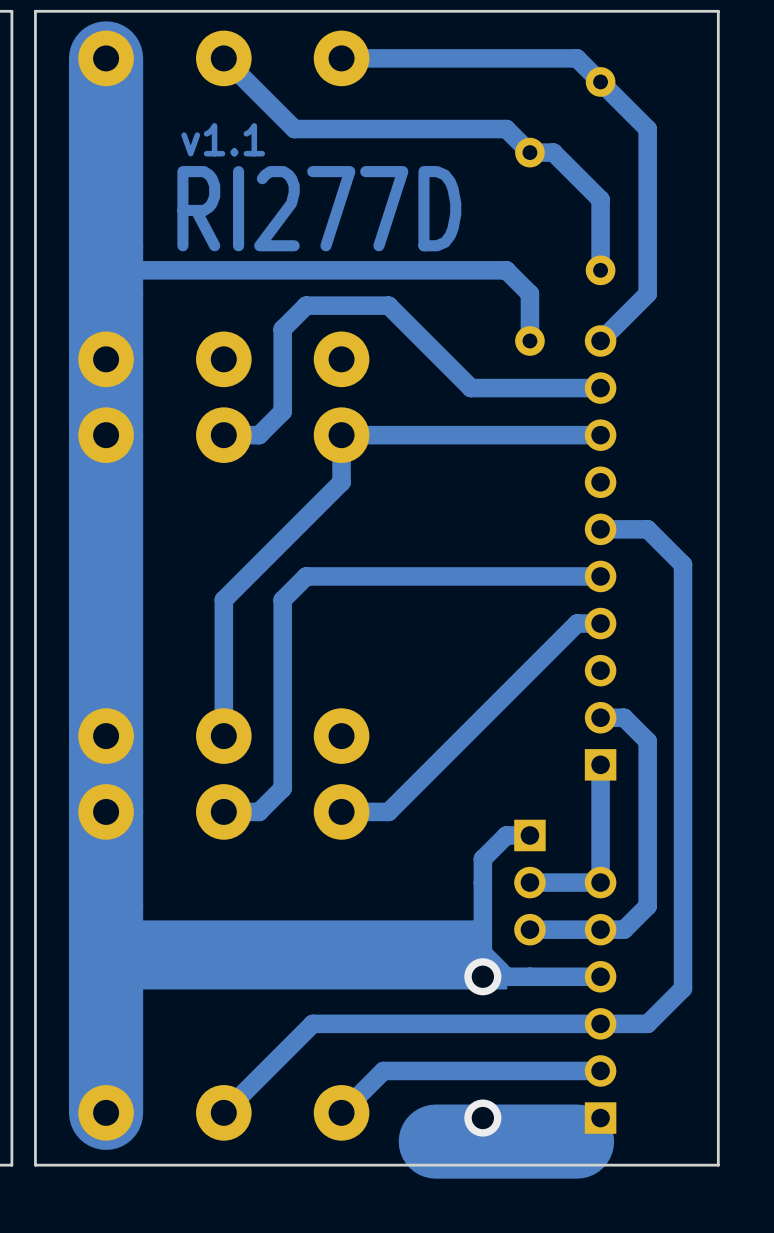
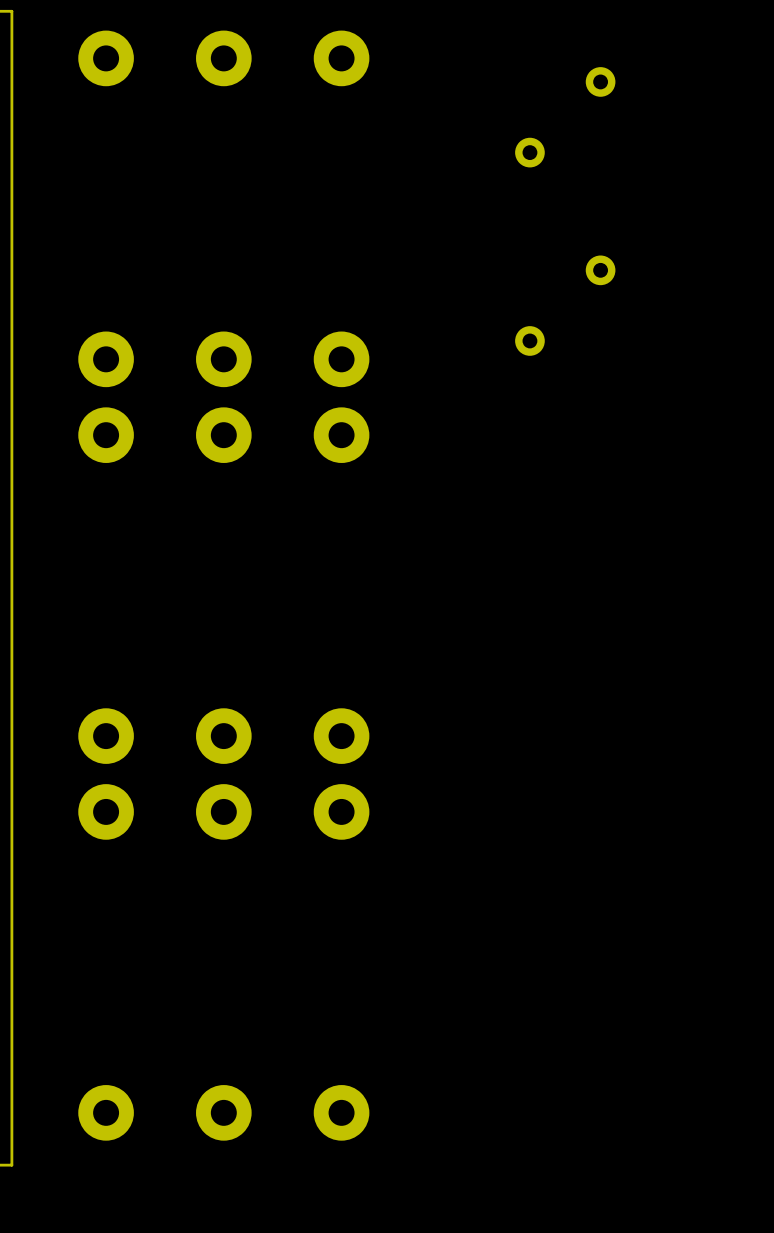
board edge: (718, 11) (35, 11) (35, 1165) (718, 1165) (718, 11) -> none
track: (106, 58) (106, 1112) -> none
track: (223, 58) (294, 129) (506, 129) (529, 152) (553, 152) (600, 199) (600, 270) -> none
track: (341, 58) (577, 58) (647, 129) (647, 293) (600, 340) -> none
text: v1.1 (223, 139) -> none
text: RI277D (319, 208) -> none
track: (106, 246) (129, 270) (506, 270) (529, 293) (529, 340) -> none
track: (600, 388) (471, 388) (388, 305) (306, 305) (282, 329) (282, 411) (259, 435) (223, 435) -> none
track: (600, 435) (341, 435) (341, 482) (223, 600) (223, 736) -> none
track: (600, 529) (647, 529) (683, 564) (683, 988) (647, 1023) (312, 1023) (223, 1112) -> none
part: (600, 552) -> none
track: (600, 576) (306, 576) (282, 600) (282, 788) (259, 811) (223, 811) -> none
track: (600, 623) (577, 623) (388, 811) (341, 811) -> none
track: (600, 717) (624, 717) (647, 741) (647, 906) (624, 929) (529, 929) -> none
track: (600, 764) (600, 882) (529, 882) -> none
track: (529, 835) (506, 835) (482, 859) (482, 953) (506, 976) (600, 976) -> none
part: (529, 882) -> none
drawing: [140, 928, 508, 990] -> none
track: (482, 929) (141, 929) -> none
via: (482, 976) -> none
part: (600, 1000) -> none
track: (600, 1070) (383, 1070) (341, 1112) -> none
via: (482, 1118) -> none
track: (529, 1118) (600, 1118) (577, 1141) (435, 1141) -> none

